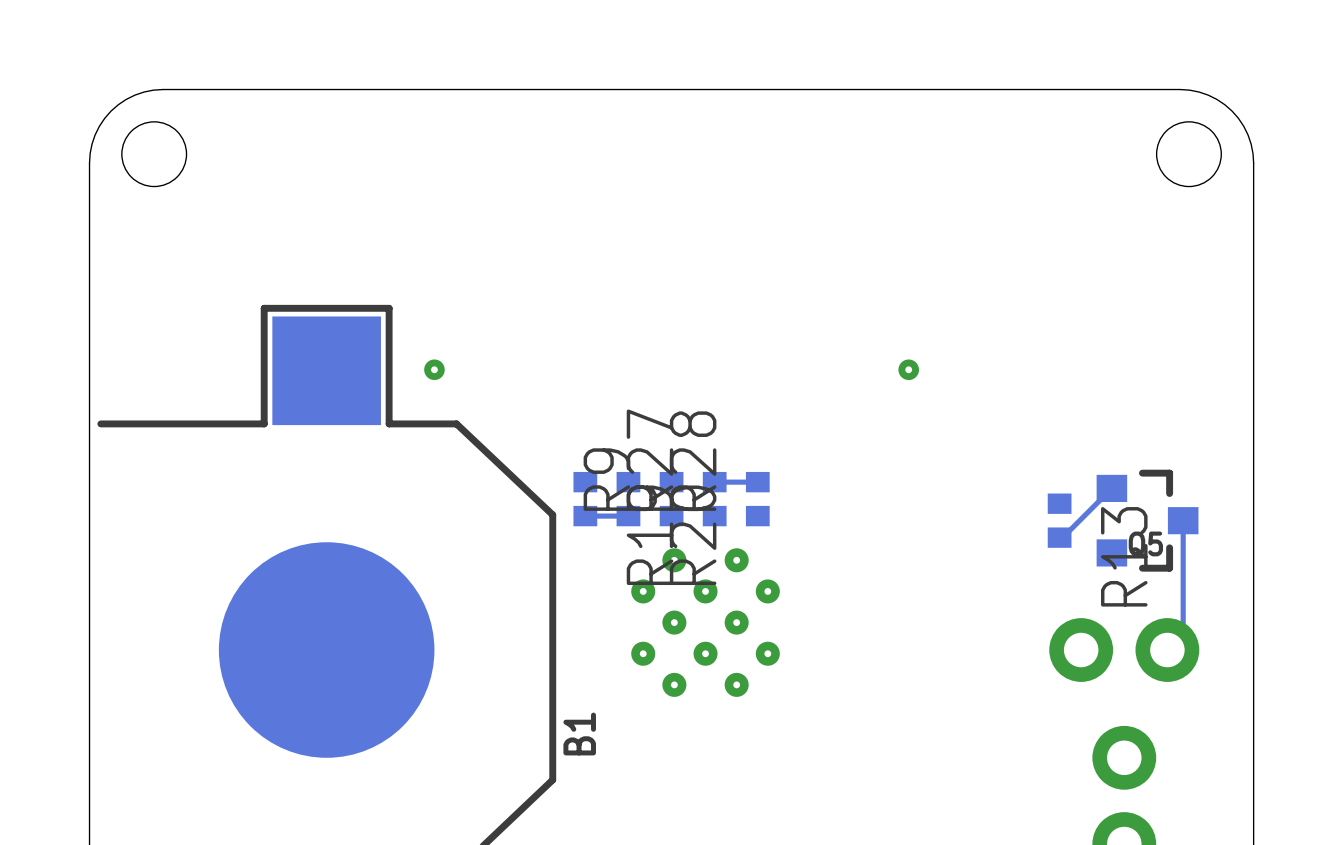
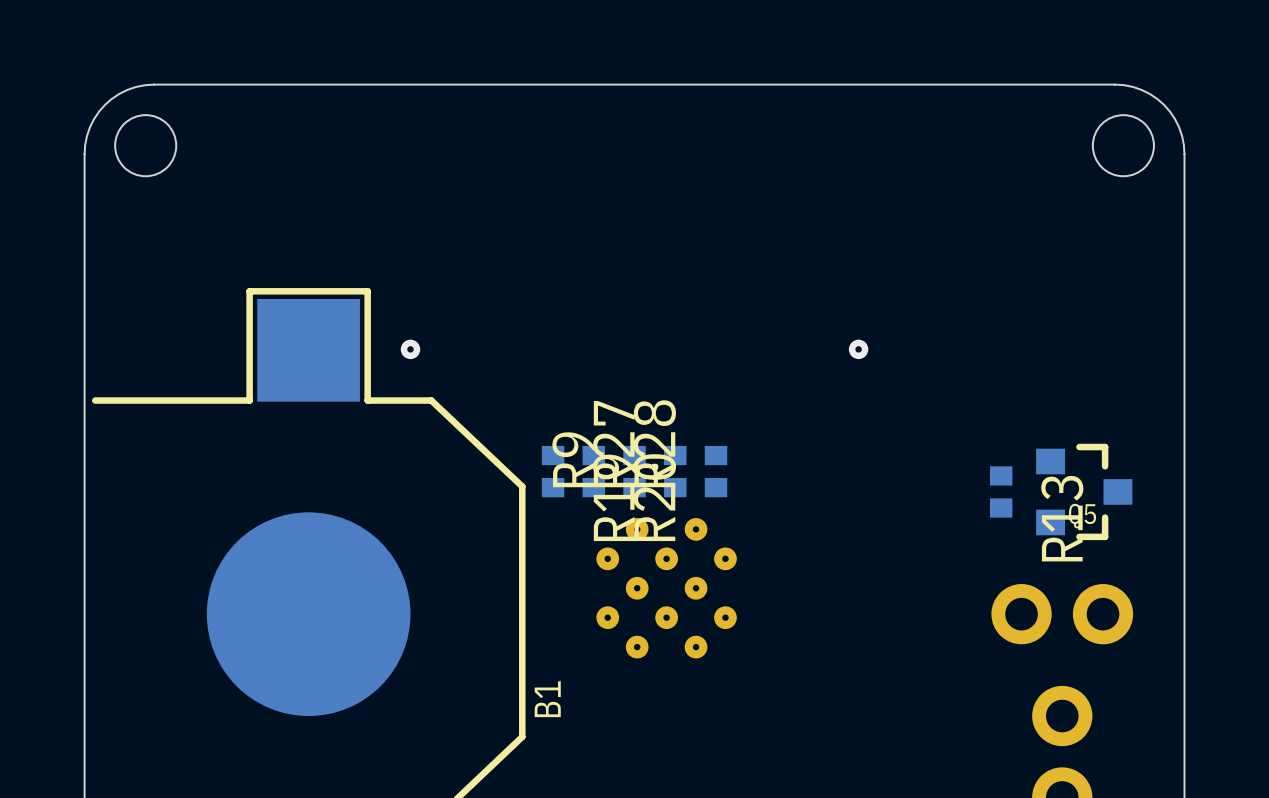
track: (757, 482) (714, 482) -> none
track: (1111, 488) (1062, 537) (1059, 537) -> none
track: (628, 516) (585, 516) -> none
track: (1183, 520) (1183, 634) (1167, 650) -> none

